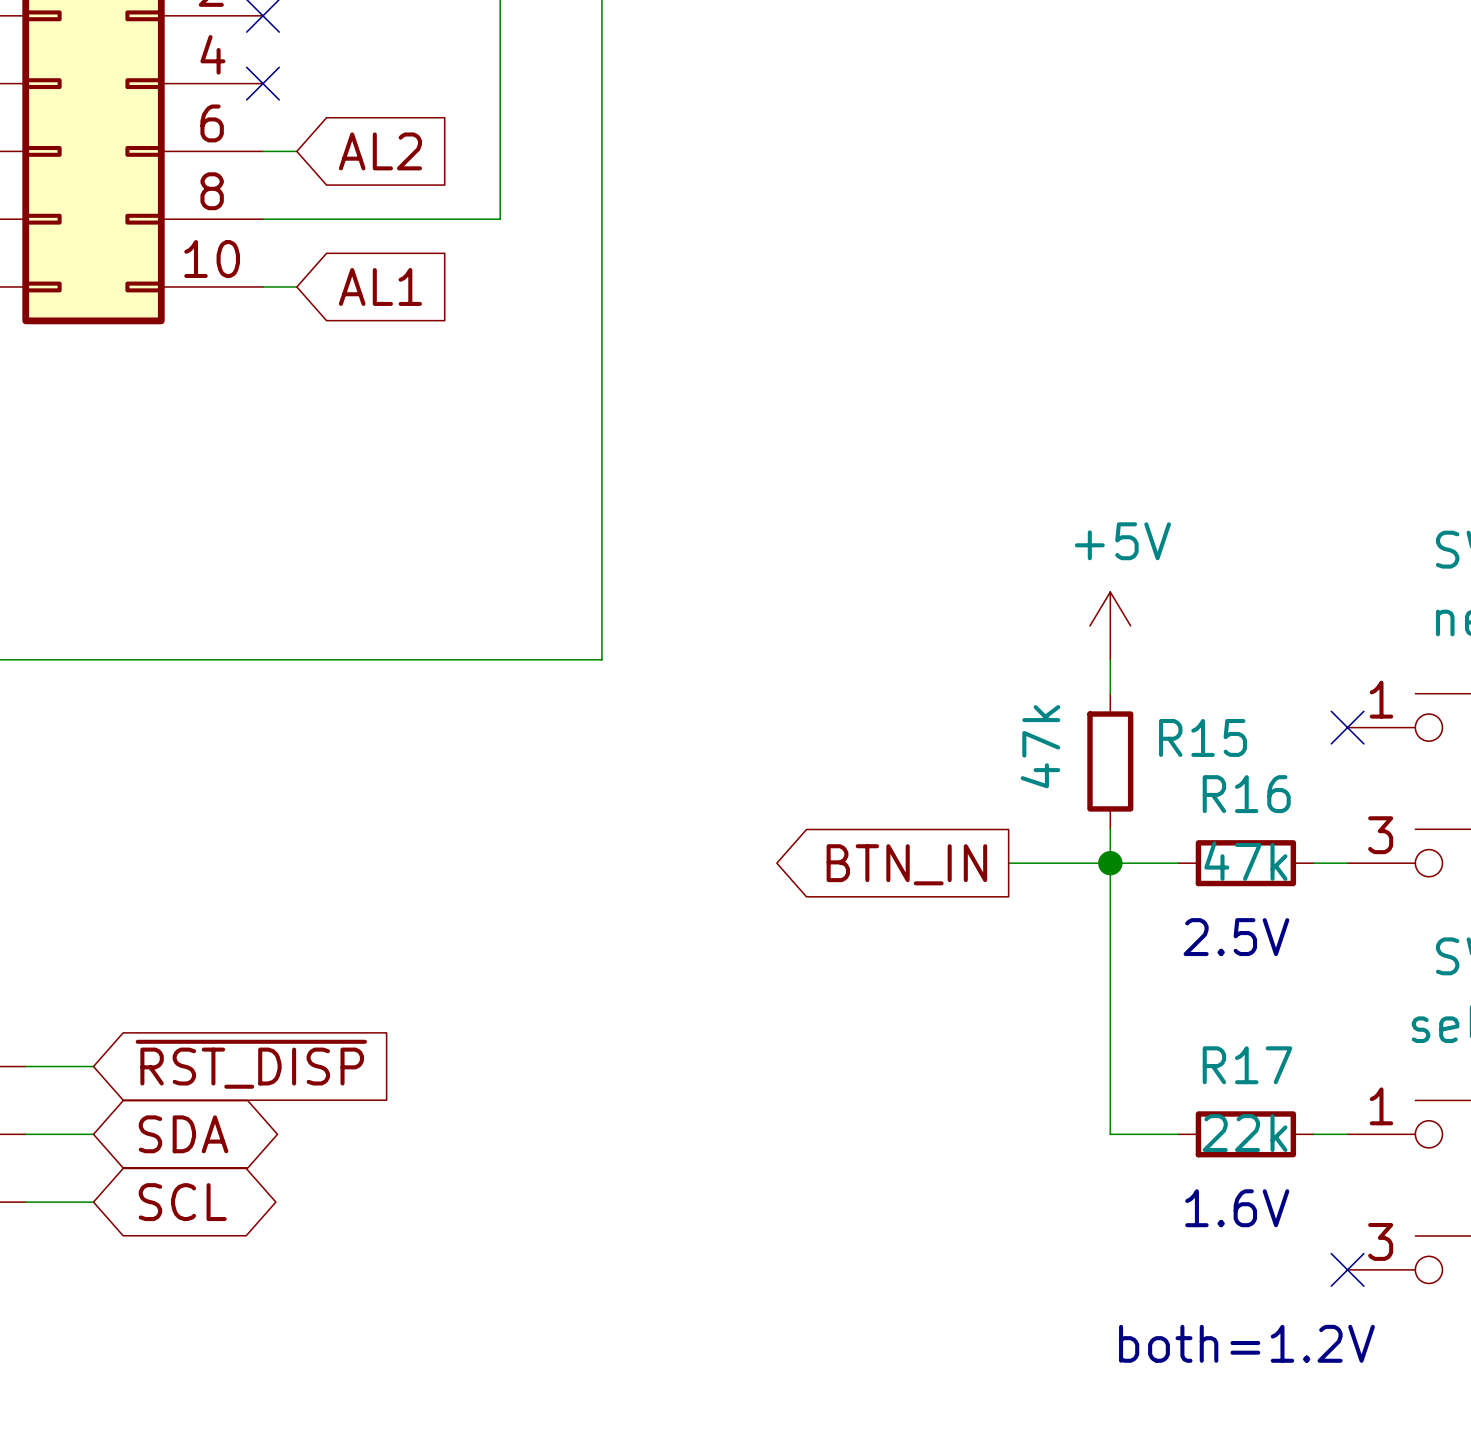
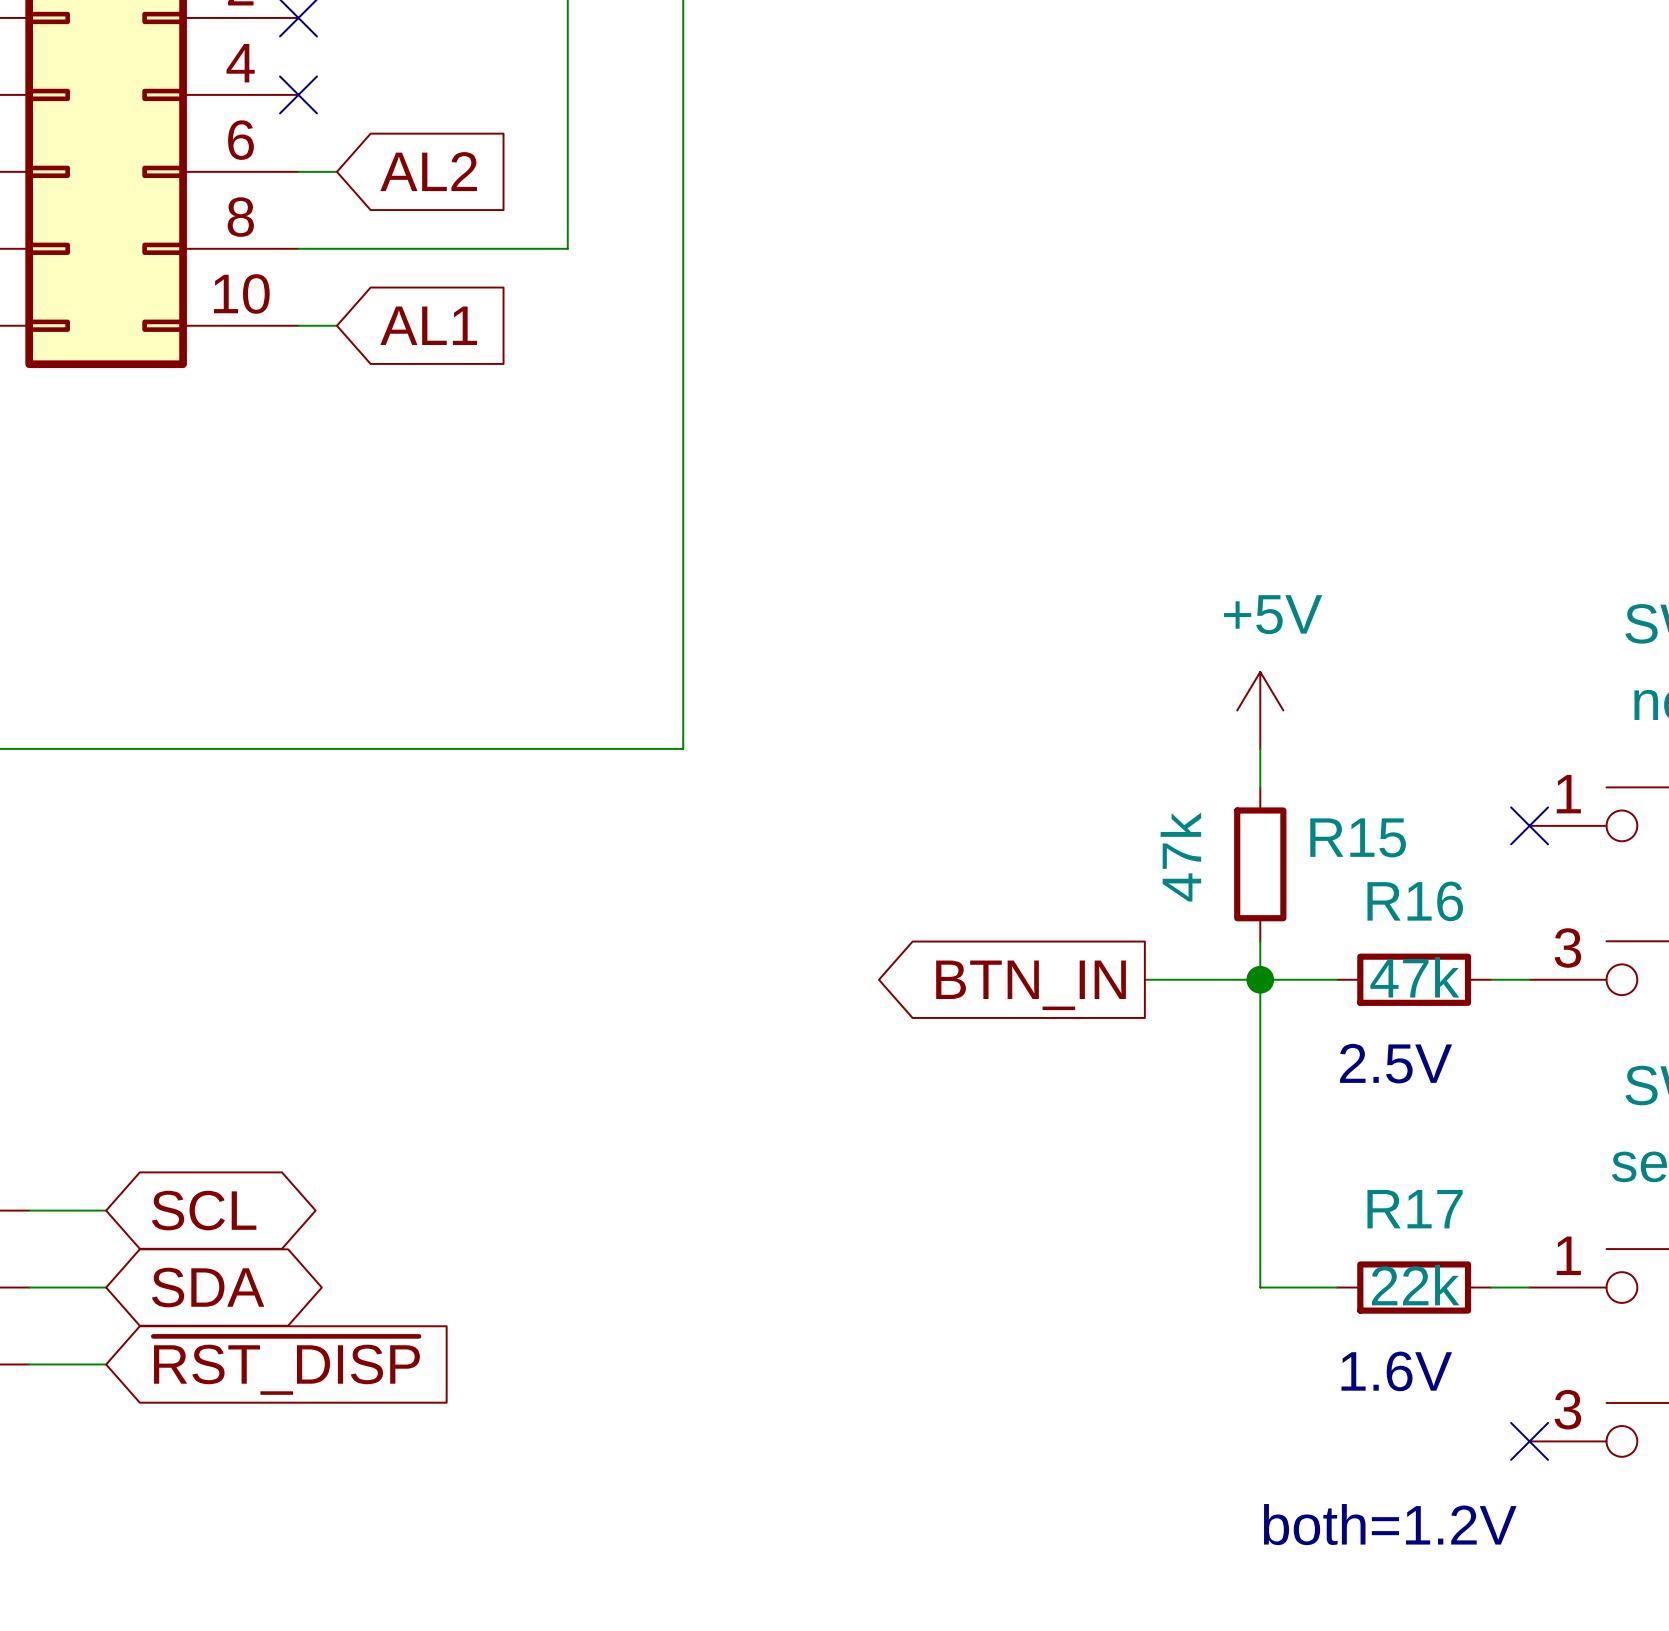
global label shape: input (251, 1064) -> bidirectional (204, 1210)
global label: ~{RST_DISP} (251, 1064) -> SCL (204, 1210)
global label shape: bidirectional (182, 1202) -> input (286, 1365)
global label: SCL (182, 1202) -> ~{RST_DISP} (286, 1365)

